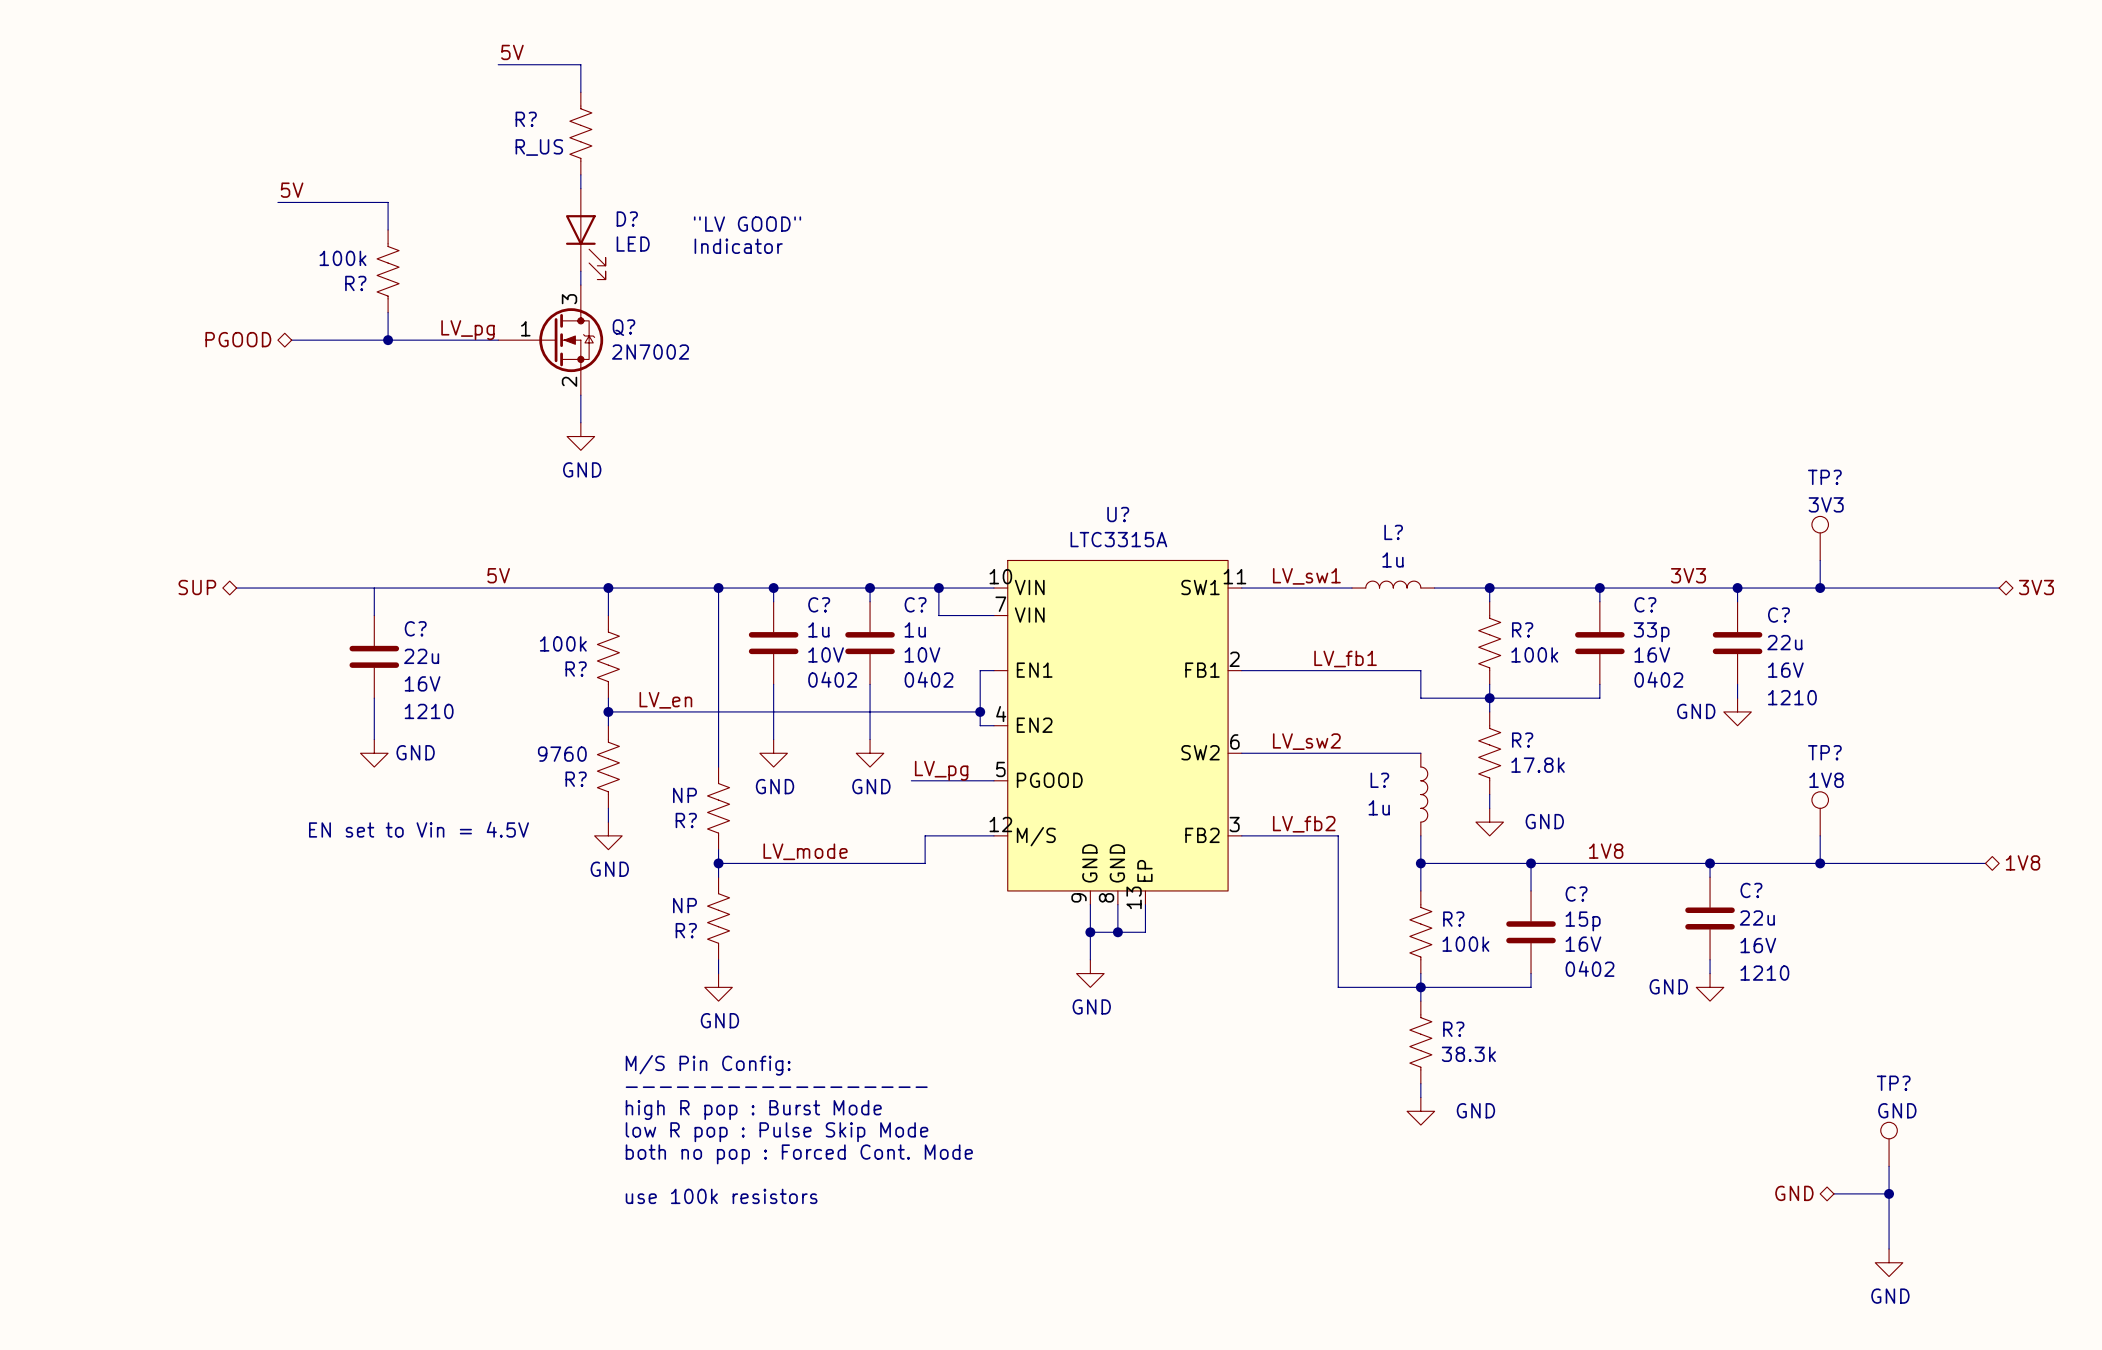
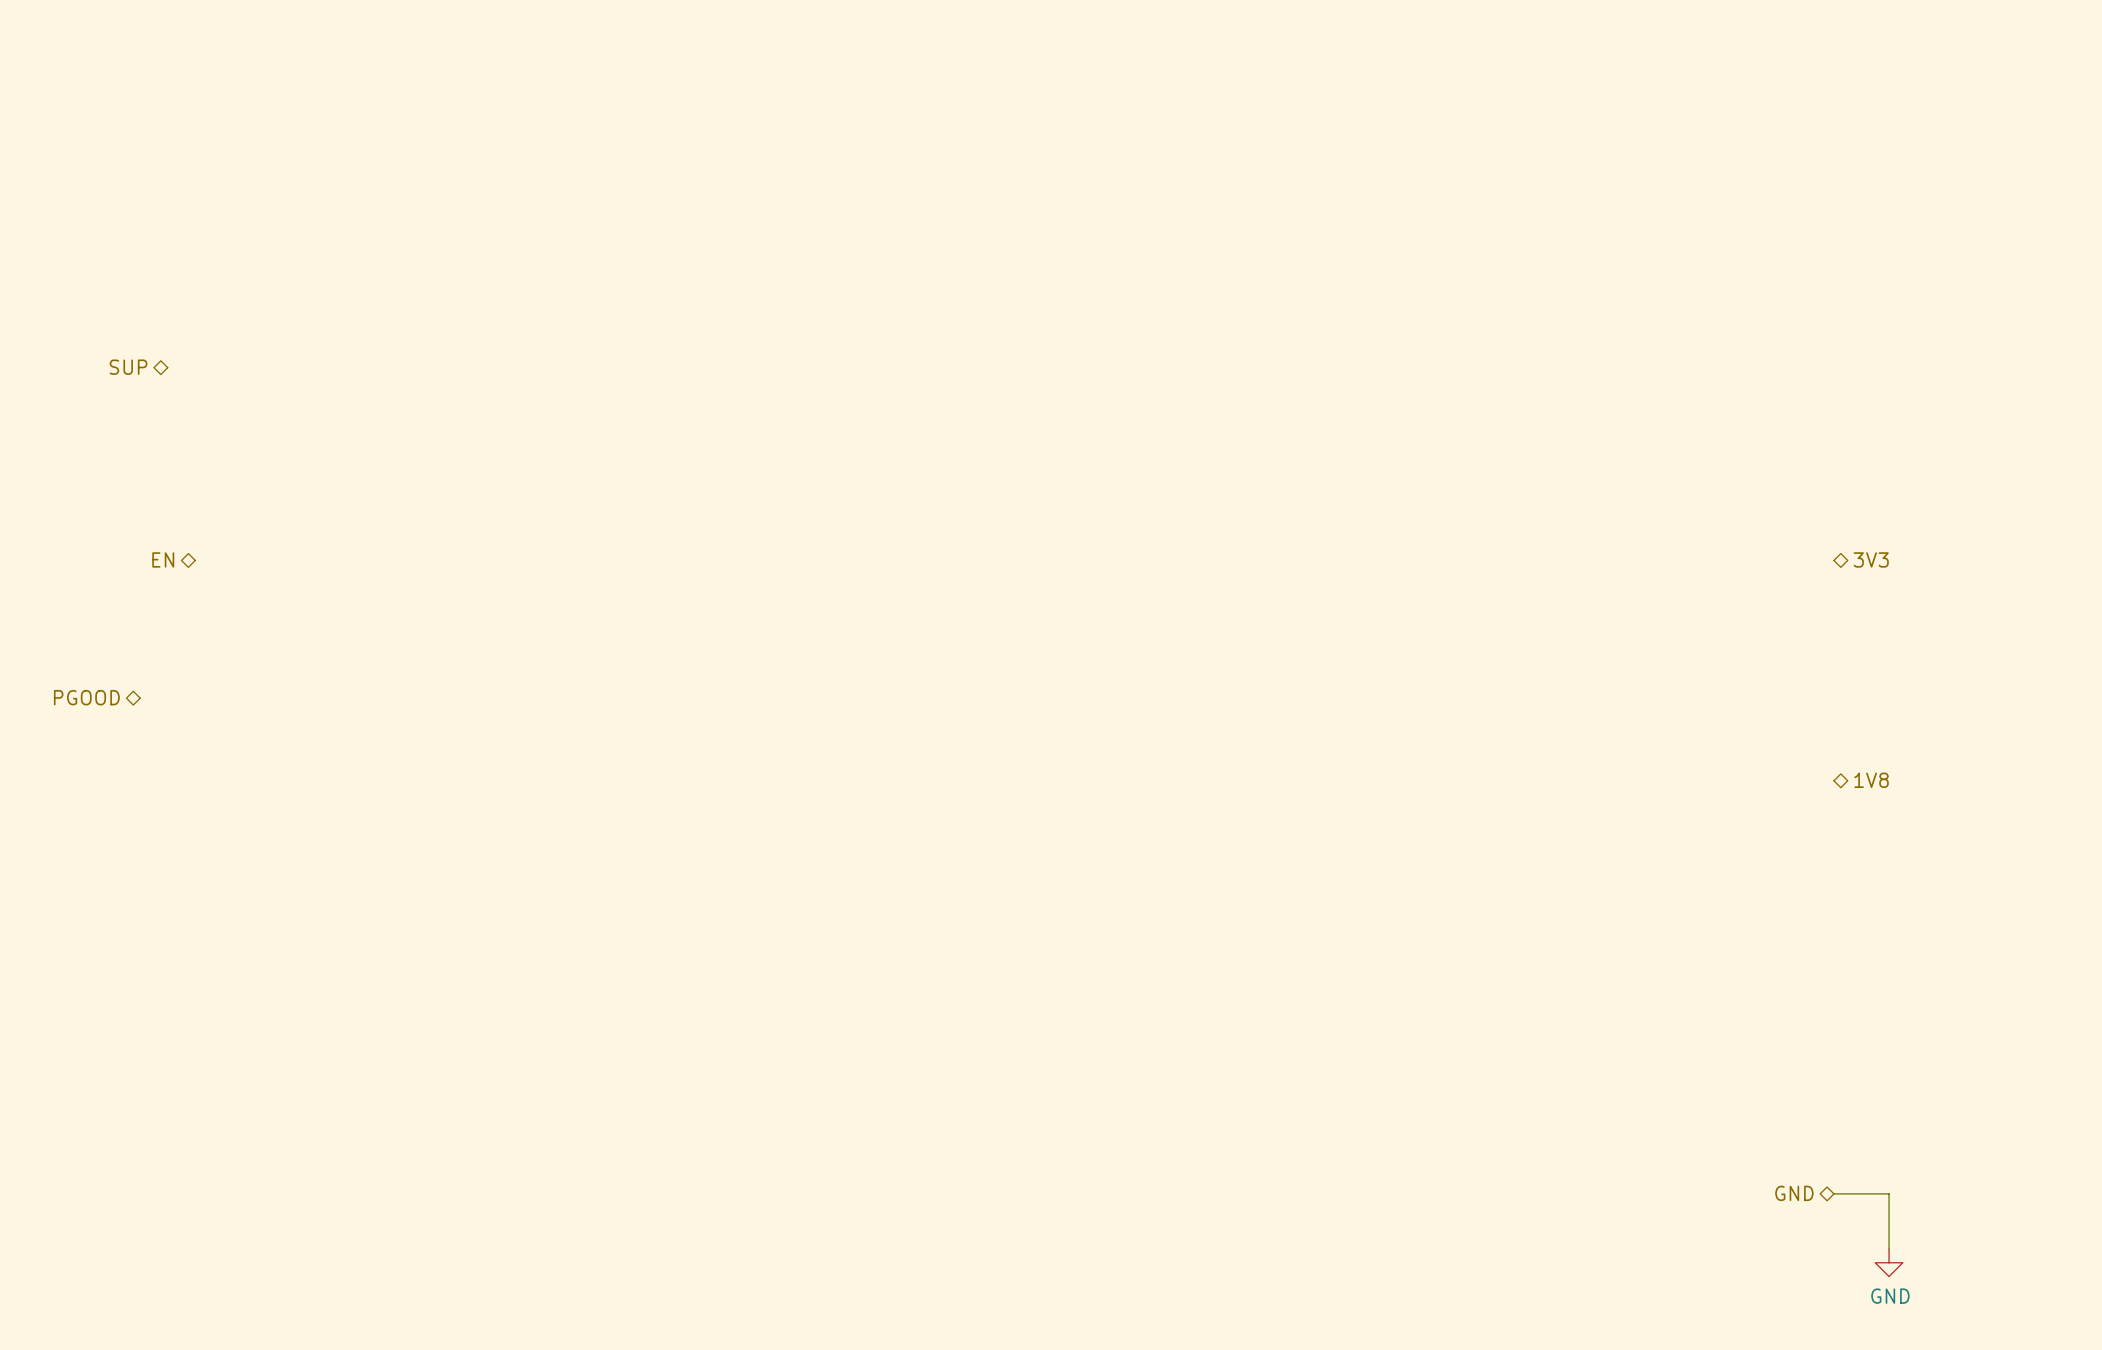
label: 5V (512, 52) -> none
wire: (498, 64) (580, 64) (580, 92) -> none
R?: R_US (580, 133) -> none
wire: (580, 174) (580, 188) -> none
label: 5V (292, 190) -> none
wire: (277, 202) (388, 202) (388, 229) -> none
text: "LV GOOD" (747, 224) -> none
D?: LED (585, 234) -> none
text: Indicator (738, 246) -> none
R?: 100k (388, 271) -> none
wire: (580, 271) (580, 285) -> none
wire: (388, 312) (388, 340) -> none
label: LV_pg (467, 330) -> none
hierarchical label: PGOOD (238, 339) -> none
wire: (291, 340) (498, 340) -> none
junction: (388, 340) -> none
Q?: 2N7002 (550, 340) -> none
wire: (580, 395) (580, 422) -> none
power symbol: GND (580, 436) -> none
TP?: 3V3 (1820, 538) -> none
hierarchical label: none -> EN (163, 559)
wire: (1820, 560) (1820, 588) -> none
label: 5V (498, 575) -> none
label: 3V3 (1688, 575) -> none
label: LV_sw1 (1306, 576) -> none
L?: 1u (1393, 584) -> none
hierarchical label position: SUP (197, 587) -> SUP (128, 367)
hierarchical label position: 3V3 (2036, 587) -> 3V3 (1871, 559)
wire: (236, 588) (993, 588) -> none
wire: (374, 588) (374, 615) -> none
wire: (608, 588) (608, 615) -> none
junction: (608, 588) -> none
wire: (718, 588) (718, 767) -> none
junction: (718, 588) -> none
wire: (773, 588) (773, 601) -> none
junction: (773, 588) -> none
wire: (870, 588) (870, 601) -> none
junction: (870, 588) -> none
wire: (938, 588) (938, 615) (993, 615) -> none
junction: (938, 588) -> none
wire: (1241, 588) (1351, 588) -> none
wire: (1434, 588) (1999, 588) -> none
wire: (1489, 588) (1489, 601) -> none
junction: (1489, 588) -> none
wire: (1599, 588) (1599, 601) -> none
junction: (1599, 588) -> none
wire: (1737, 588) (1737, 601) -> none
junction: (1737, 588) -> none
junction: (1820, 588) -> none
C?: 1u (773, 643) -> none
C?: 1u (870, 643) -> none
R?: 100k (1489, 643) -> none
C?: 33p (1599, 643) -> none
C?: 22u (1737, 643) -> none
C?: 22u (374, 656) -> none
R?: 100k (608, 656) -> none
label: LV_fb1 (1345, 659) -> none
wire: (993, 670) (980, 670) (980, 725) (993, 725) -> none
wire: (1241, 670) (1420, 670) (1420, 698) (1599, 698) (1599, 684) -> none
wire: (773, 684) (773, 739) -> none
wire: (870, 684) (870, 739) -> none
wire: (1489, 684) (1489, 711) -> none
wire: (1737, 684) (1737, 698) -> none
hierarchical label: none -> PGOOD (86, 697)
wire: (374, 698) (374, 739) -> none
wire: (608, 698) (608, 725) -> none
junction: (1489, 698) -> none
label: LV_en (665, 700) -> none
wire: (608, 711) (980, 711) -> none
junction: (608, 711) -> none
junction: (980, 711) -> none
power symbol: GND (1737, 711) -> none
U?: LTC3315A (1117, 732) -> none
label: LV_sw2 (1306, 741) -> none
power symbol: GND (374, 753) -> none
power symbol: GND (773, 753) -> none
power symbol: GND (870, 753) -> none
wire: (1241, 753) (1420, 753) -> none
R?: 17.8k (1489, 753) -> none
R?: 9760 (608, 767) -> none
label: LV_pg (941, 770) -> none
wire: (911, 780) (993, 780) -> none
L?: 1u (1424, 794) -> none
wire: (1489, 794) (1489, 808) -> none
wire: (608, 808) (608, 822) -> none
R?: NP (718, 808) -> none
TP?: 1V8 (1820, 813) -> none
power symbol: GND (1489, 822) -> none
label: LV_fb2 (1304, 824) -> none
text: EN set to Vin = 4.5V (418, 829) -> none
power symbol: GND (608, 835) -> none
wire: (993, 835) (925, 835) (925, 863) (718, 863) -> none
wire: (1241, 835) (1338, 835) (1338, 987) (1531, 987) (1531, 973) -> none
wire: (1420, 835) (1420, 890) -> none
wire: (1820, 835) (1820, 863) -> none
wire: (718, 849) (718, 877) -> none
label: LV_mode (805, 851) -> none
label: 1V8 (1606, 851) -> none
hierarchical label position: 1V8 (2023, 862) -> 1V8 (1871, 780)
junction: (718, 863) -> none
wire: (1420, 863) (1985, 863) -> none
junction: (1420, 863) -> none
wire: (1531, 863) (1531, 890) -> none
junction: (1531, 863) -> none
wire: (1710, 863) (1710, 877) -> none
junction: (1710, 863) -> none
junction: (1820, 863) -> none
wire: (1090, 904) (1090, 959) -> none
wire: (1117, 904) (1117, 932) -> none
wire: (1145, 904) (1145, 932) (1090, 932) -> none
R?: NP (718, 918) -> none
C?: 22u (1710, 918) -> none
junction: (1090, 932) -> none
junction: (1117, 932) -> none
R?: 100k (1420, 932) -> none
C?: 15p (1531, 932) -> none
wire: (718, 959) (718, 973) -> none
wire: (1710, 959) (1710, 973) -> none
power symbol: GND (1090, 973) -> none
wire: (1420, 973) (1420, 1001) -> none
power symbol: GND (718, 987) -> none
junction: (1420, 987) -> none
power symbol: GND (1710, 987) -> none
R?: 38.3k (1420, 1042) -> none
text: M/S Pin Config: (708, 1065) -> none
wire: (1420, 1083) (1420, 1097) -> none
text: ------------------ (776, 1087) -> none
text: high R pop : Burst Mode (753, 1110) -> none
power symbol: GND (1420, 1111) -> none
text: low R pop : Pulse Skip Mode (777, 1132) -> none
TP?: GND (1889, 1144) -> none
text: both no pop : Forced Cont. Mode (799, 1154) -> none
wire: (1889, 1166) (1889, 1193) -> none
junction: (1889, 1193) -> none
text: use 100k resistors (721, 1196) -> none

